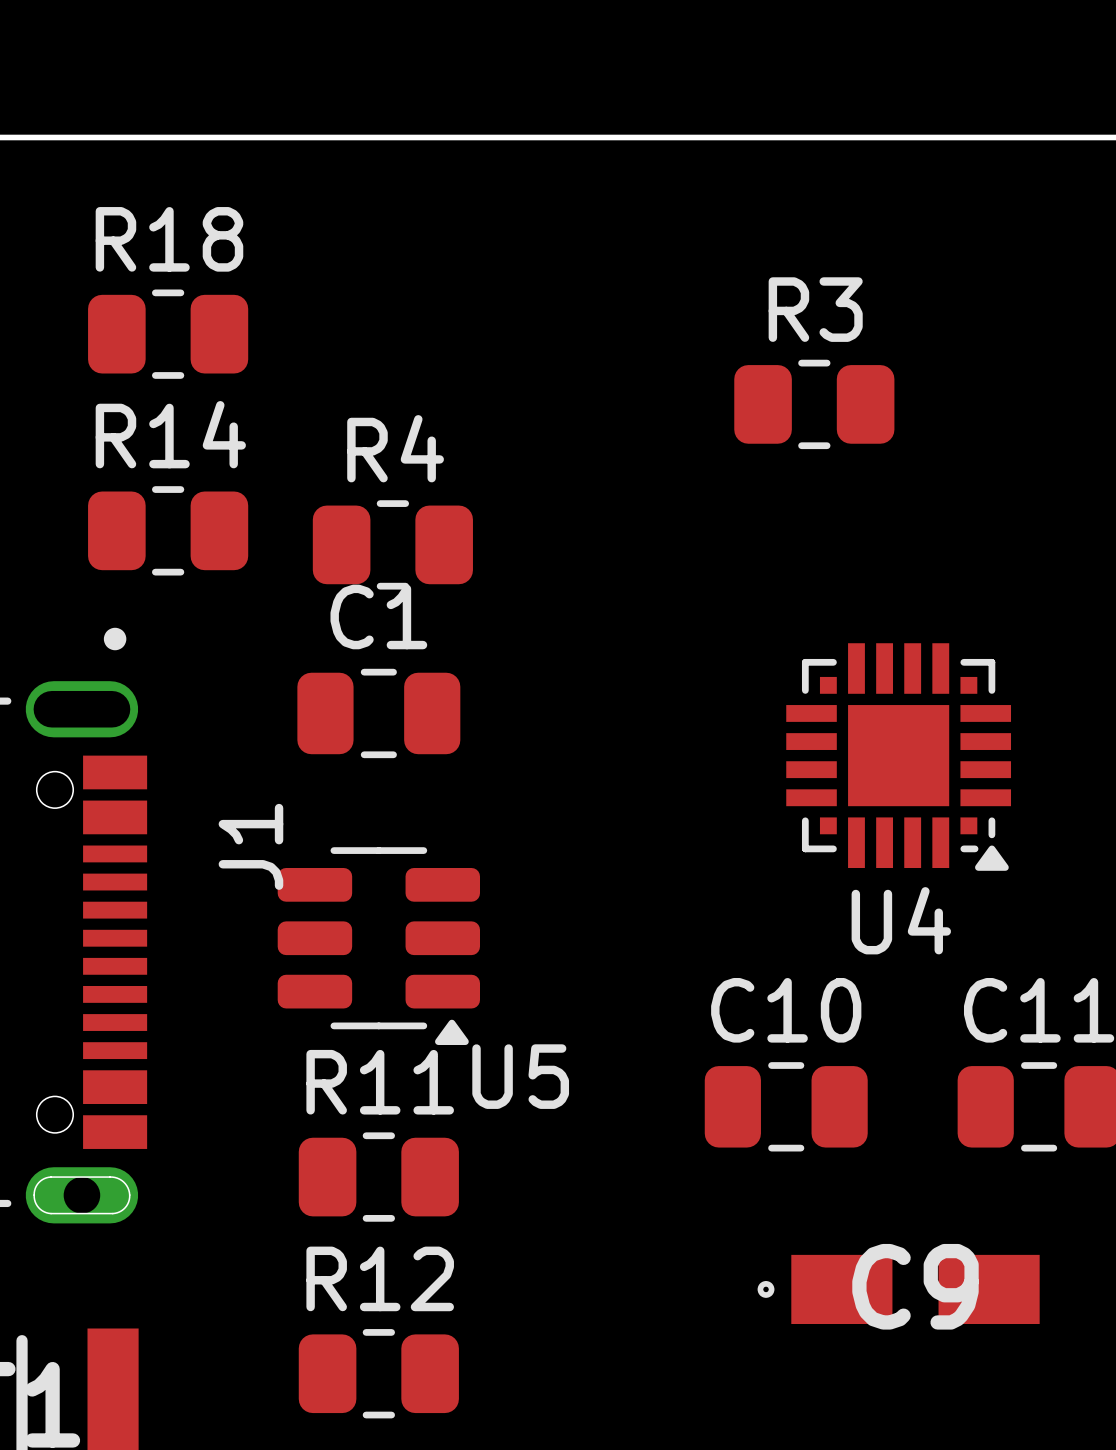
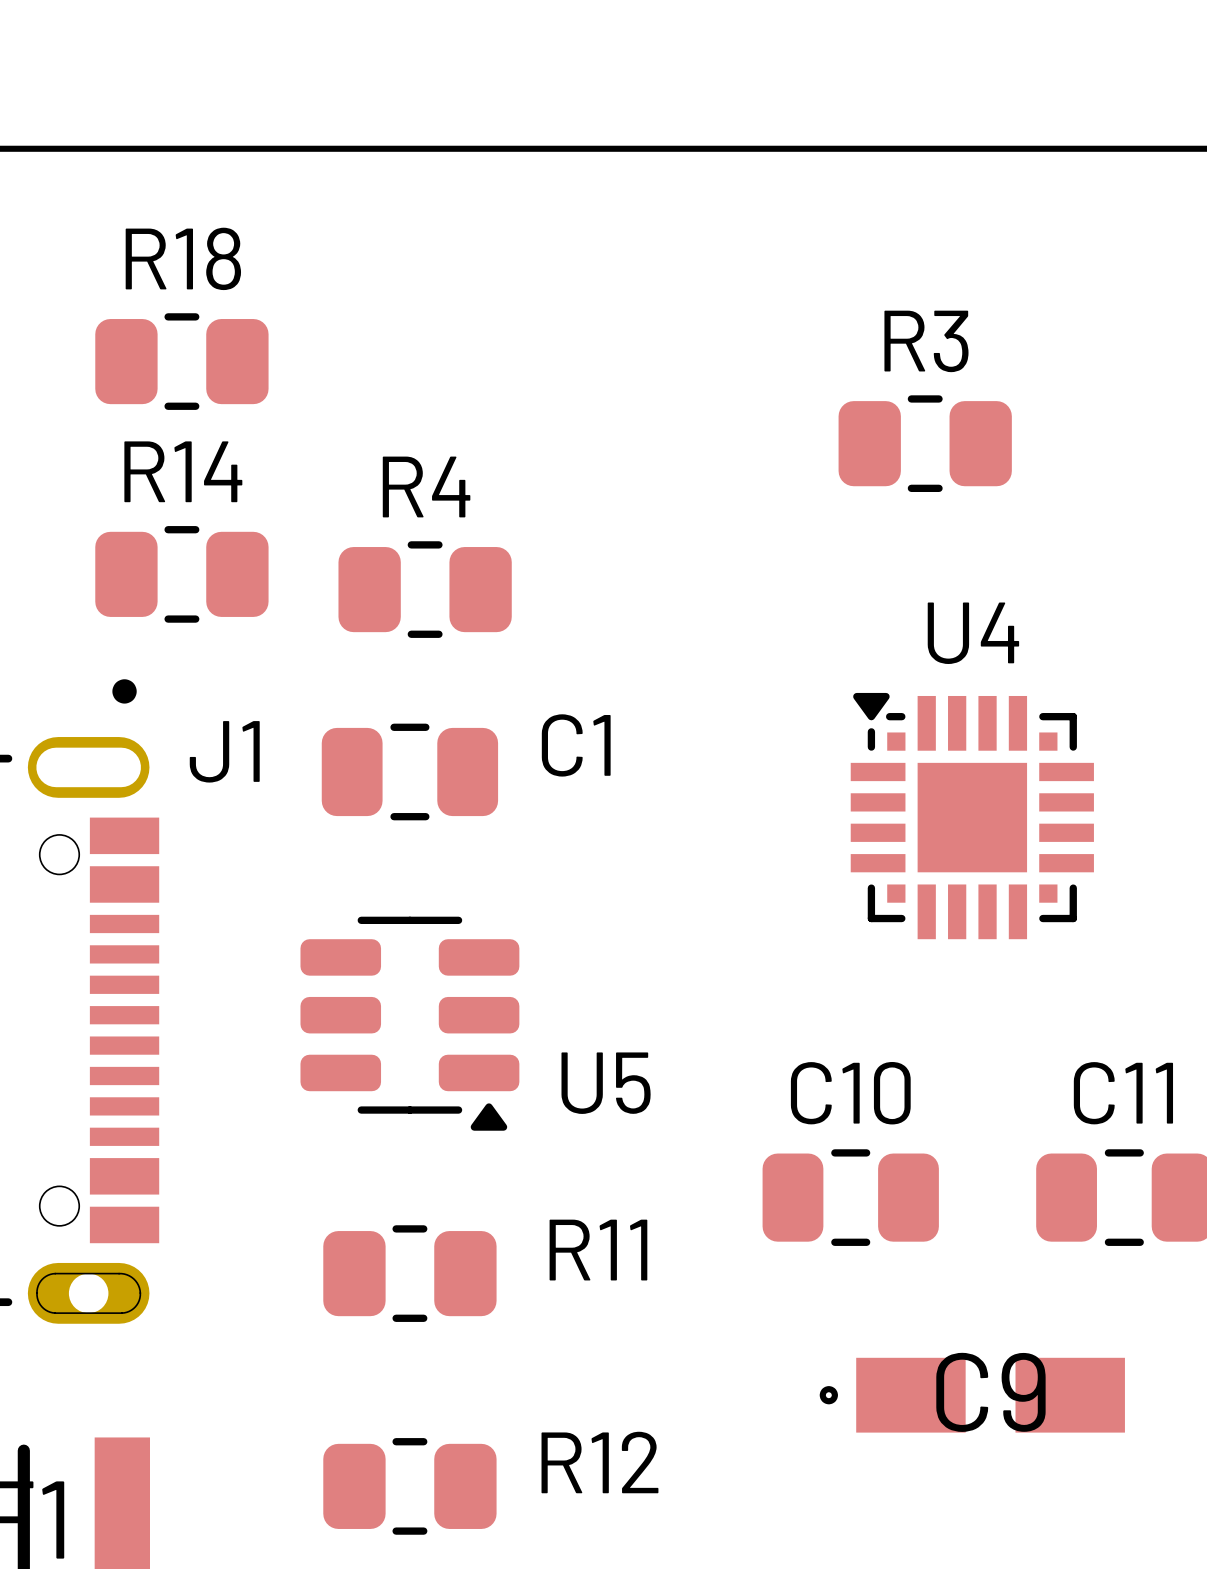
R3 position: (814, 404) -> (925, 443)
C1 name position: C1 (378, 616) -> C1 (576, 745)
U4 rotation: 0° (898, 757) -> 180° (972, 816)
J1 name rotation: 0° (250, 846) -> 90° clockwise (224, 751)
J1 name position: J1 (250, 846) -> J1 (224, 751)
U5 name position: U5 (520, 1076) -> U5 (606, 1083)
R11 name position: R11 (380, 1082) -> R11 (598, 1250)
R12 name position: R12 (380, 1278) -> R12 (599, 1462)

